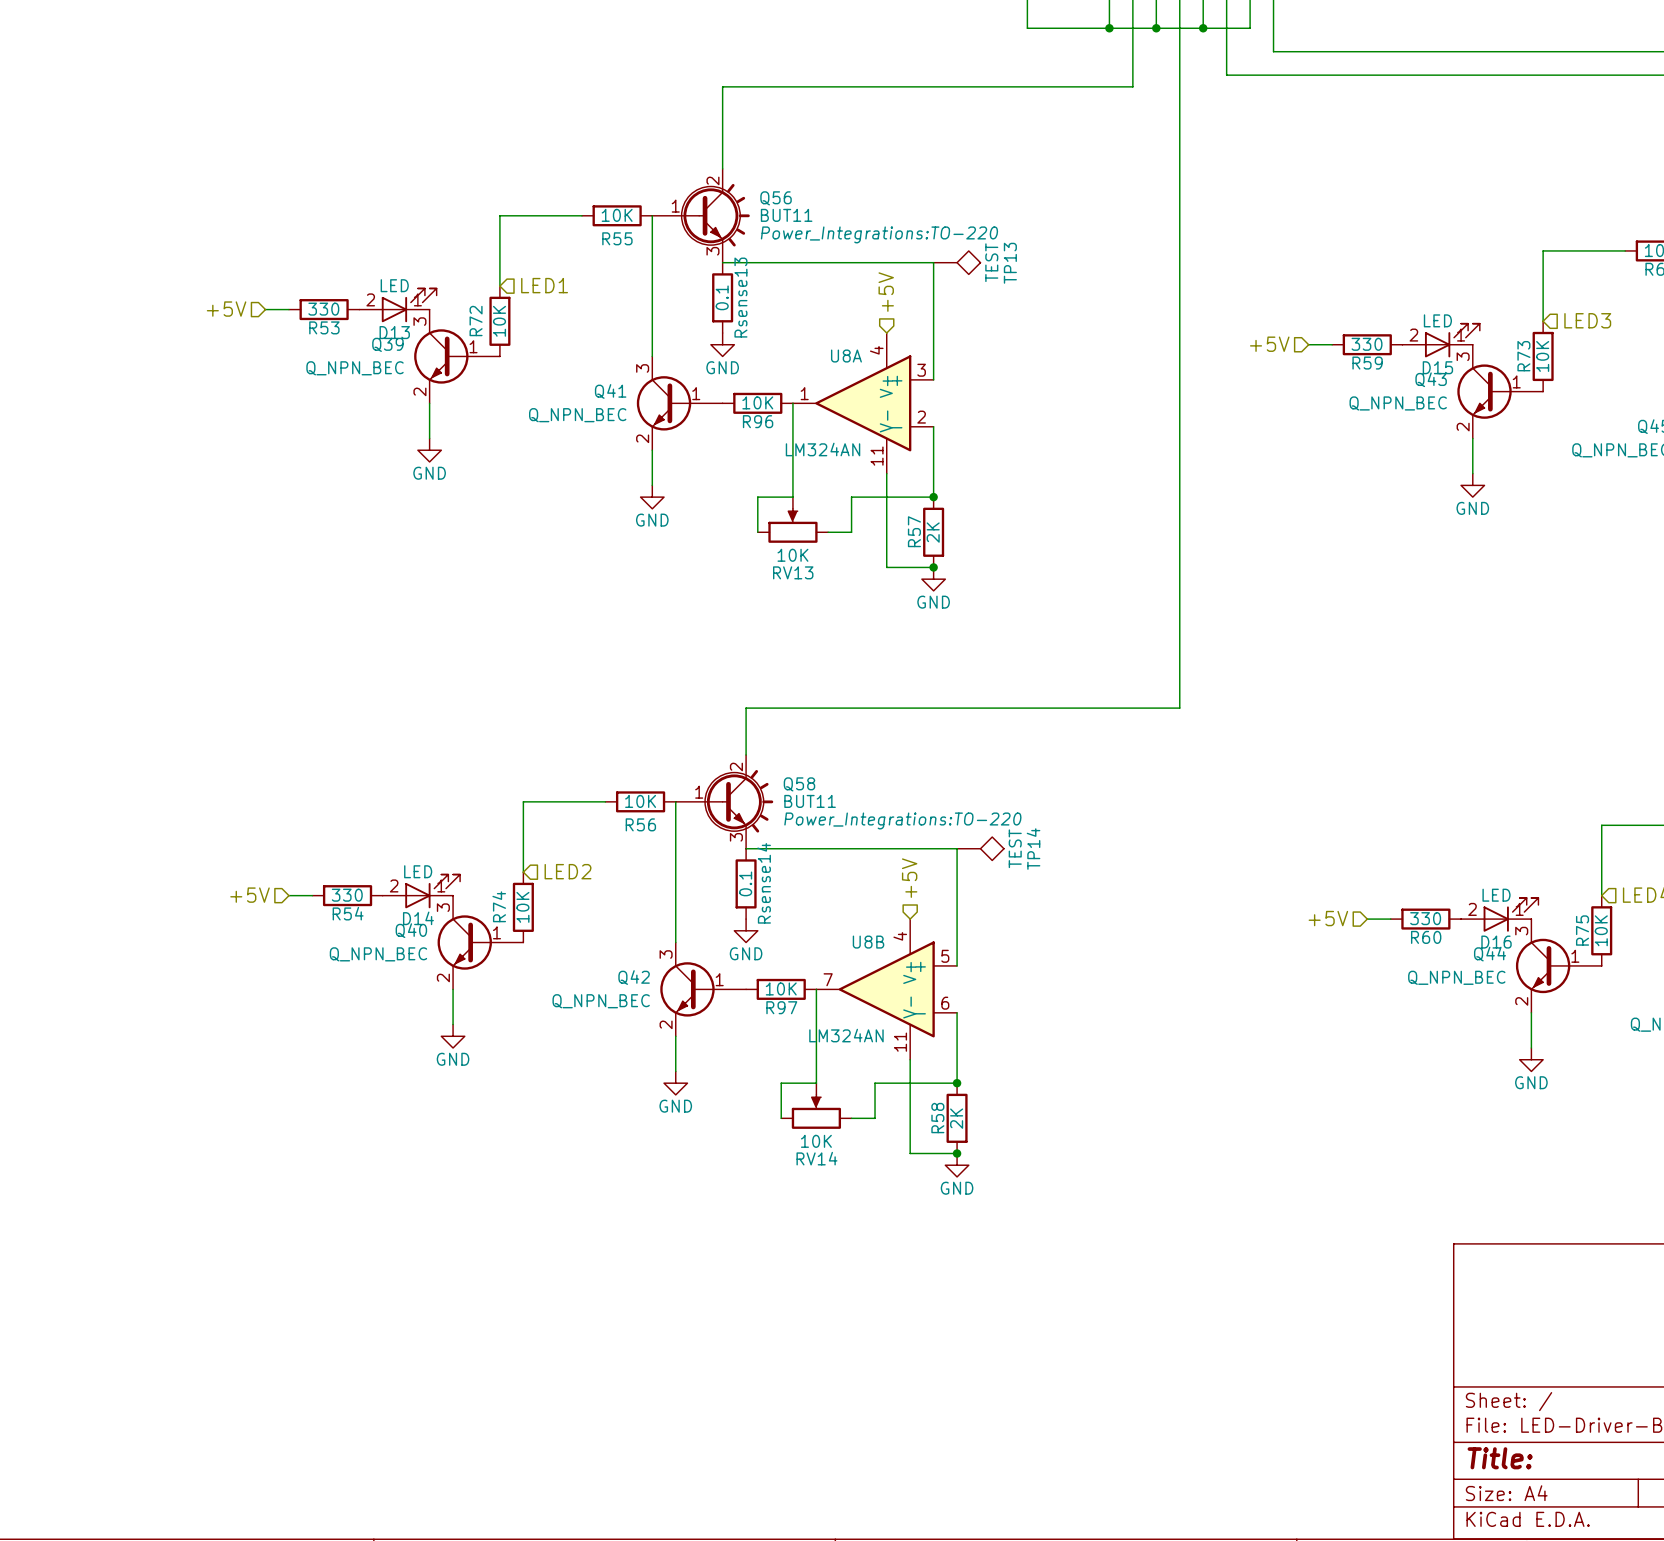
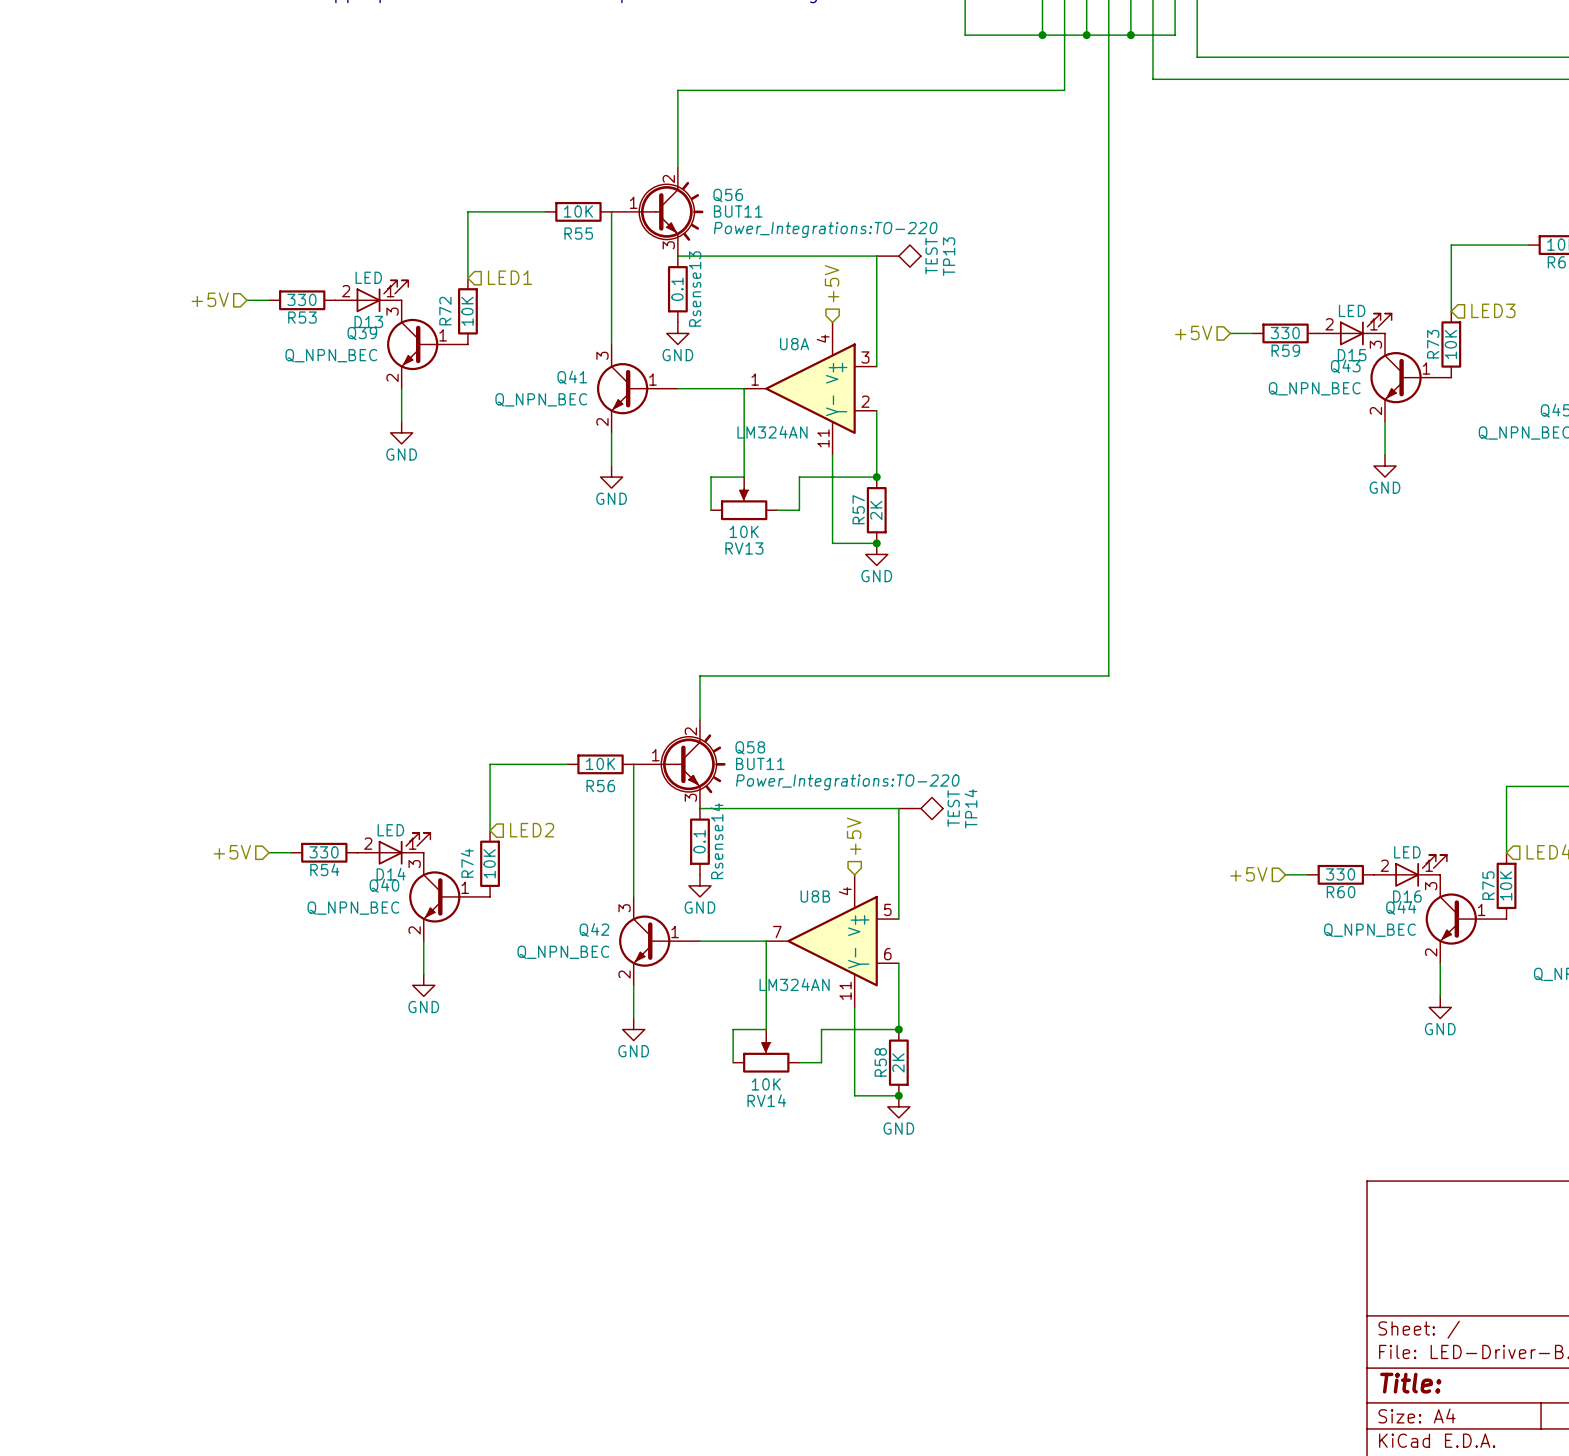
wire: none -> (677, 388) (744, 388)
R96: 10K (757, 403) -> none
wire: none -> (699, 941) (766, 941)
R97: 10K (781, 989) -> none

